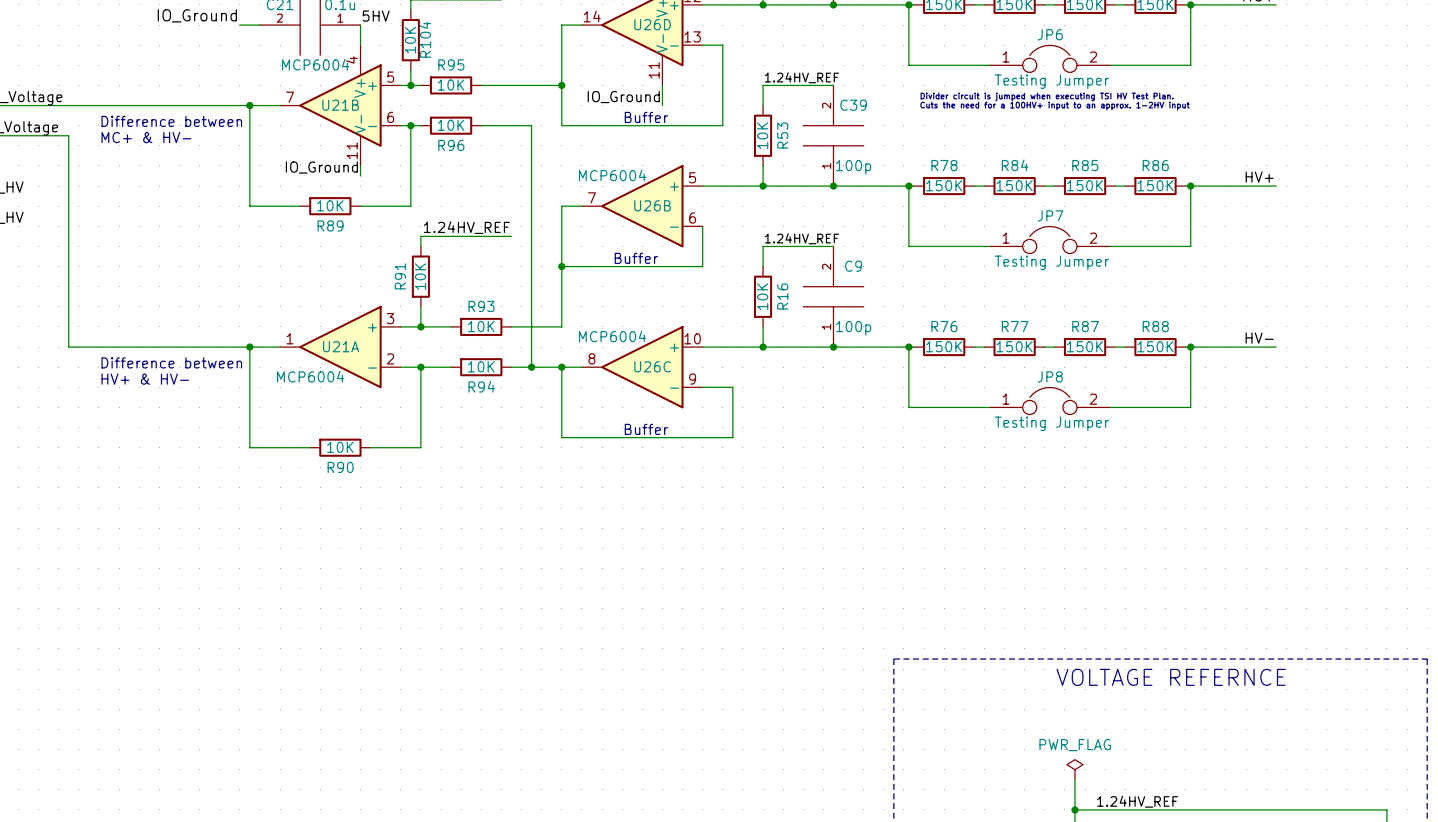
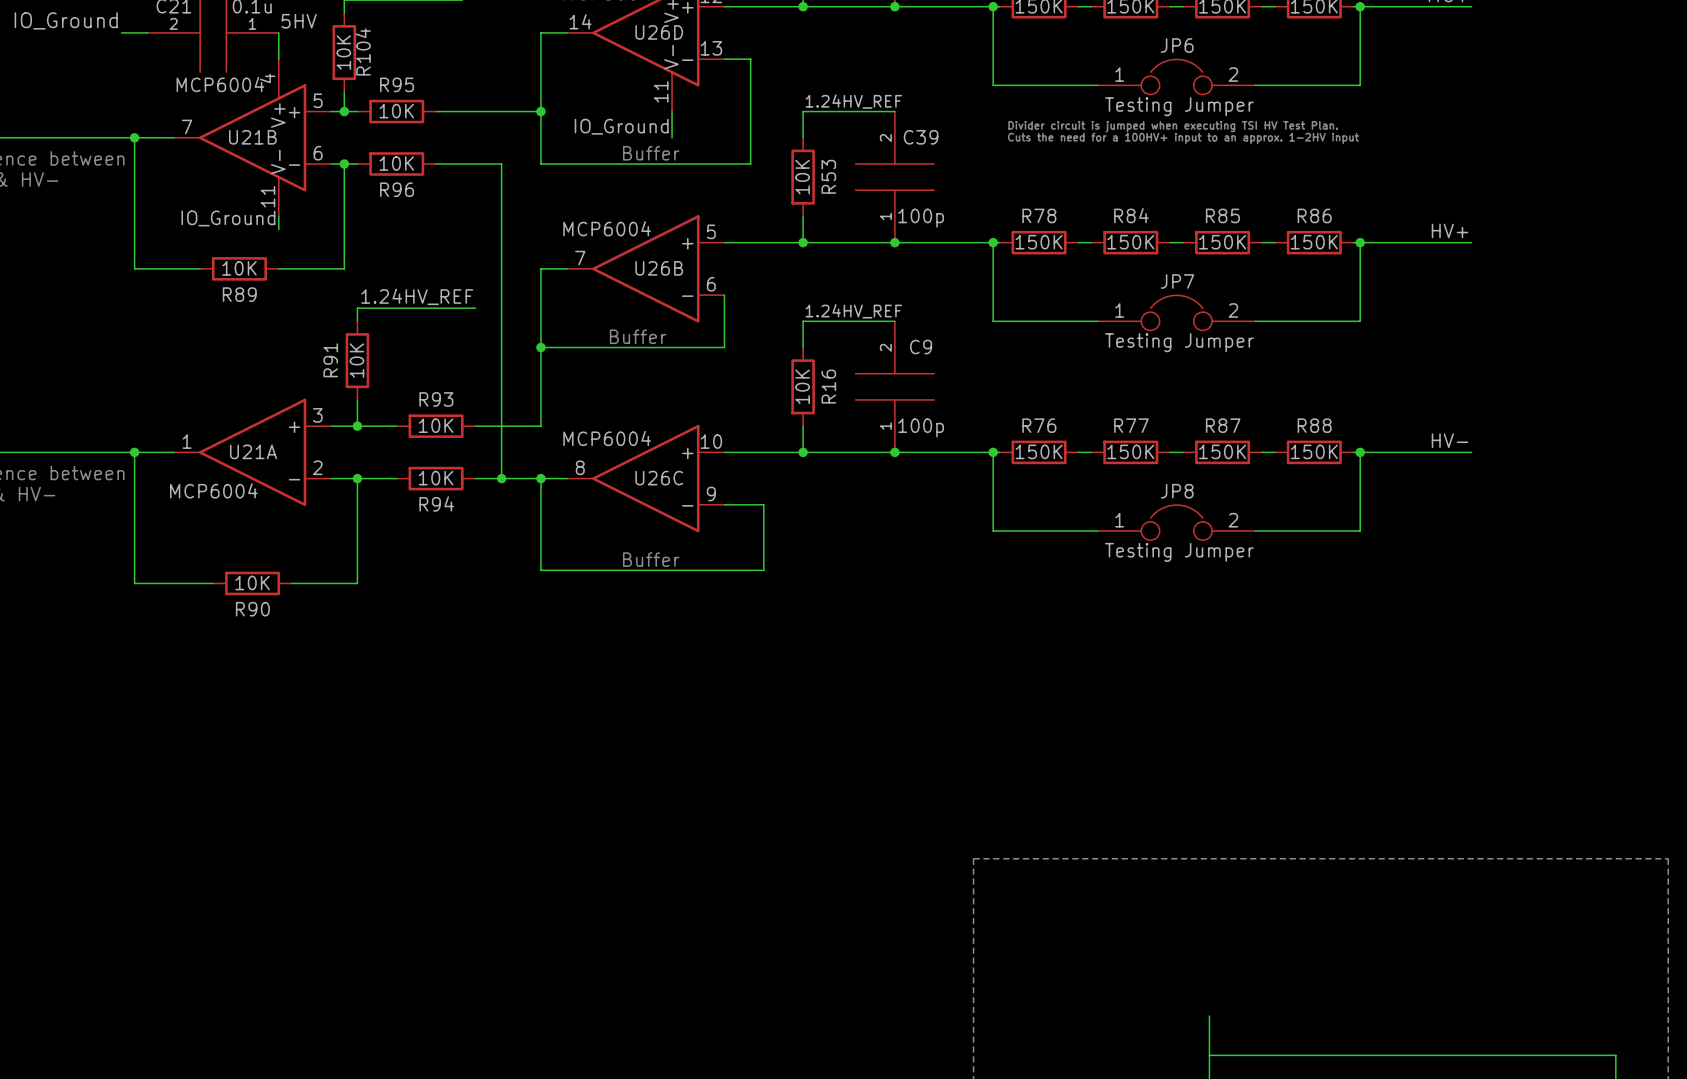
text: VOLTAGE REFERNCE (1171, 677) -> none
power symbol: PWR_FLAG (1074, 769) -> none
label: 1.24HV_REF (1137, 801) -> none
junction: (1074, 809) -> none

